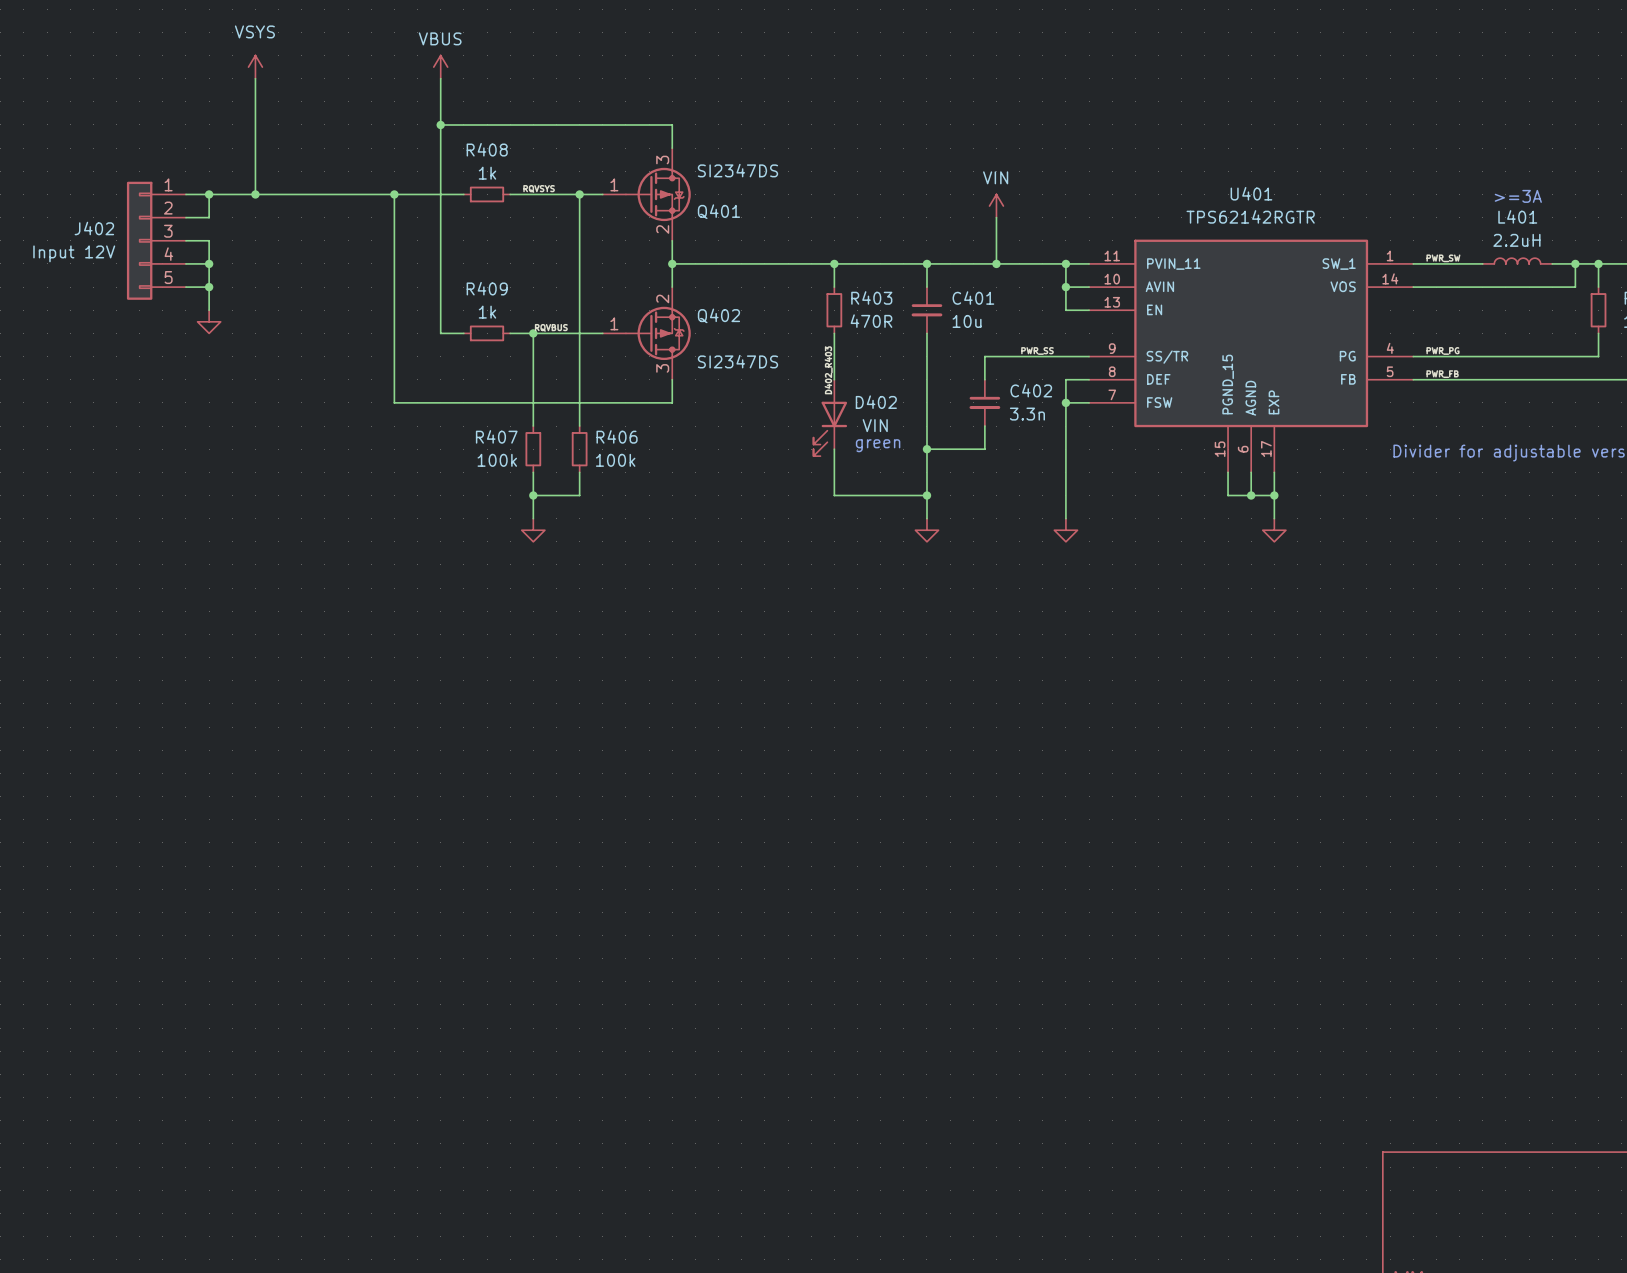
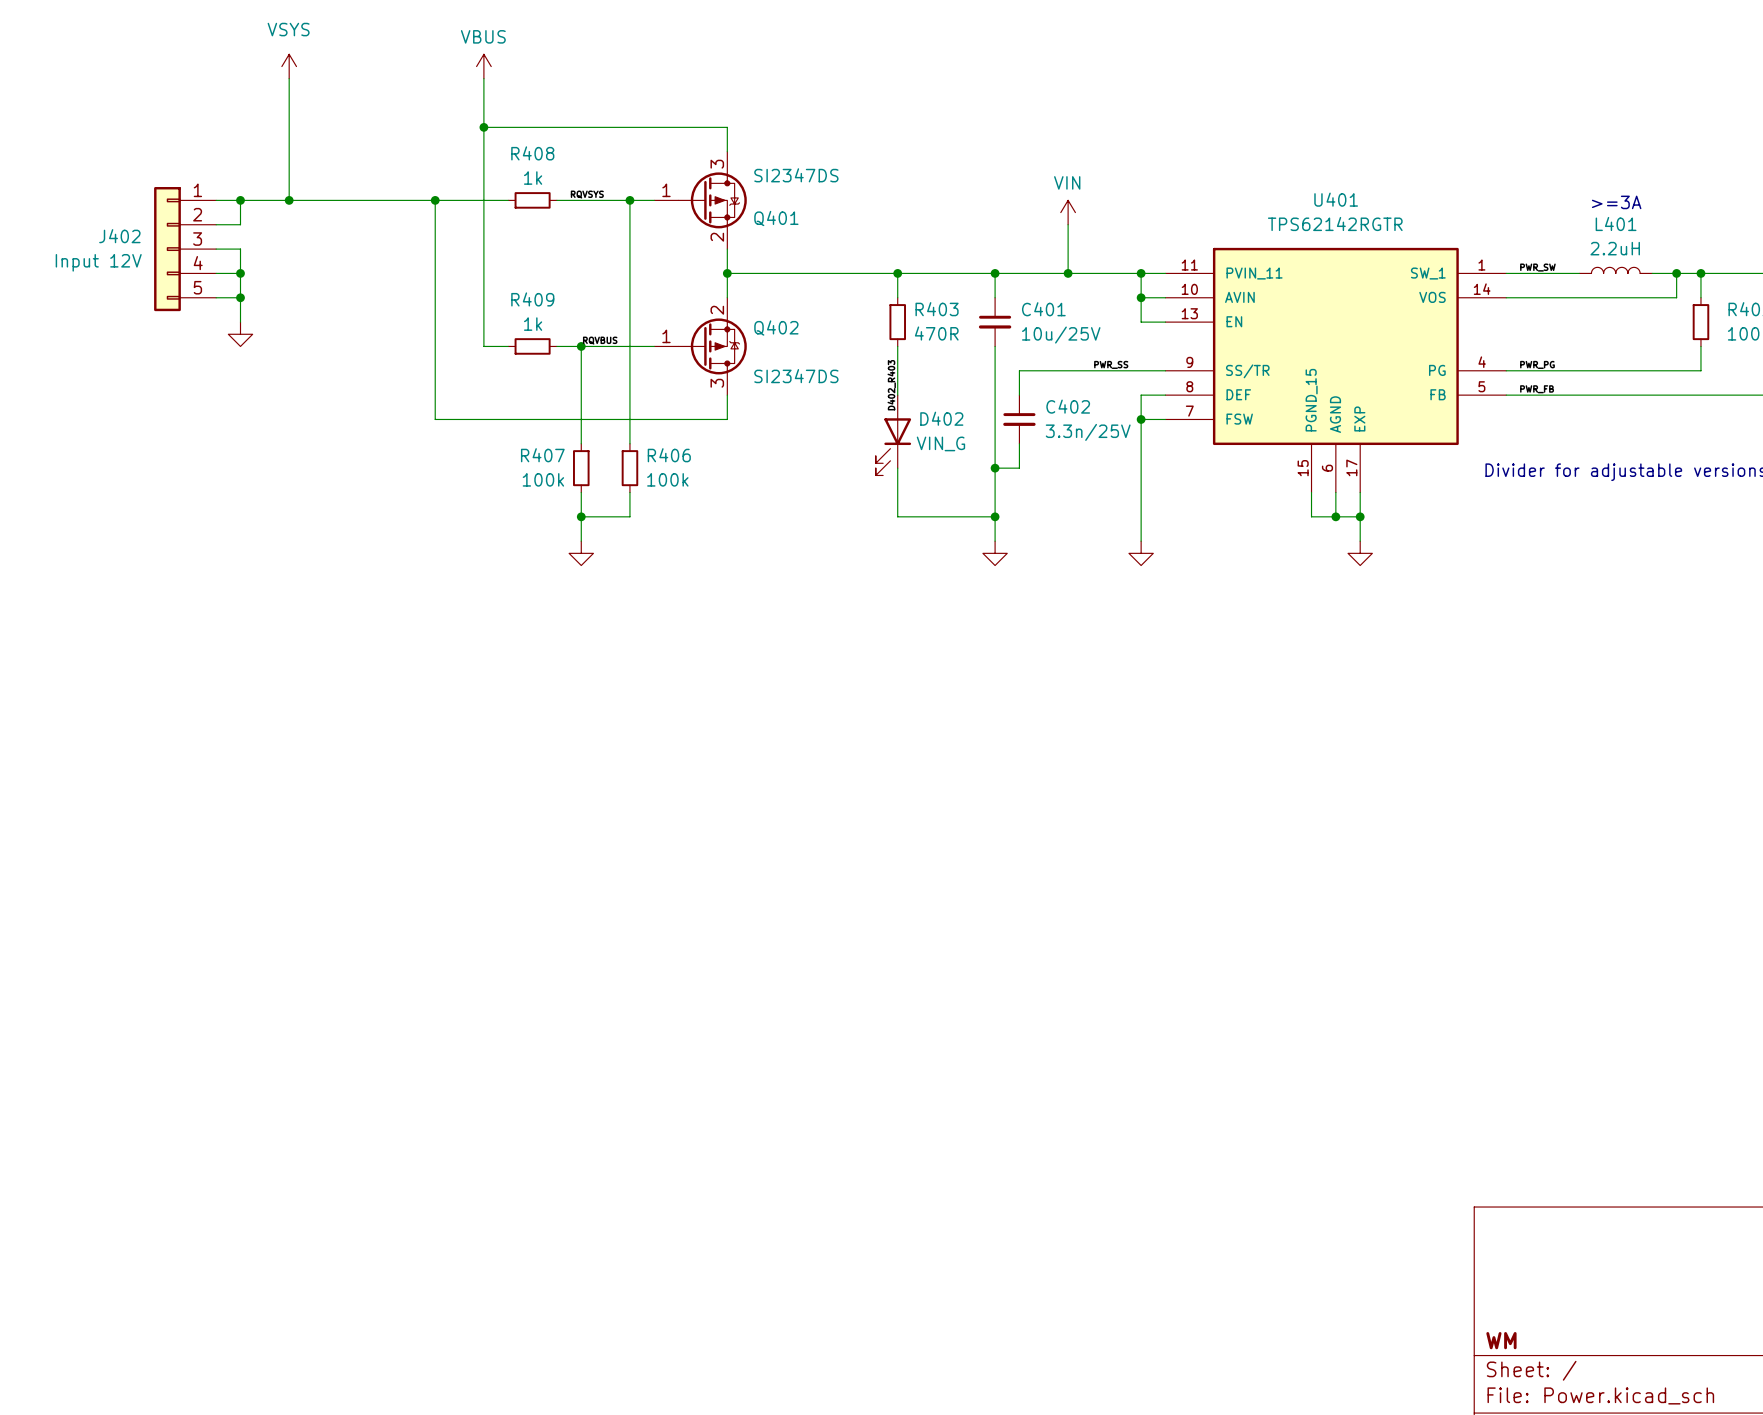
C401 value: 10u (967, 321) -> 10u/25V (1061, 335)
wire: (984, 356) (984, 379) -> (1055, 370) (1019, 370) (1019, 395)
C402 position: (984, 402) -> (1019, 419)
C402 value: 3.3n (1027, 414) -> 3.3n/25V (1088, 432)
D402 value: VIN (875, 425) -> VIN_G (940, 443)
wire: (984, 426) (984, 449) (950, 449) -> (1019, 443) (1019, 468)
text: green (878, 445) -> none

